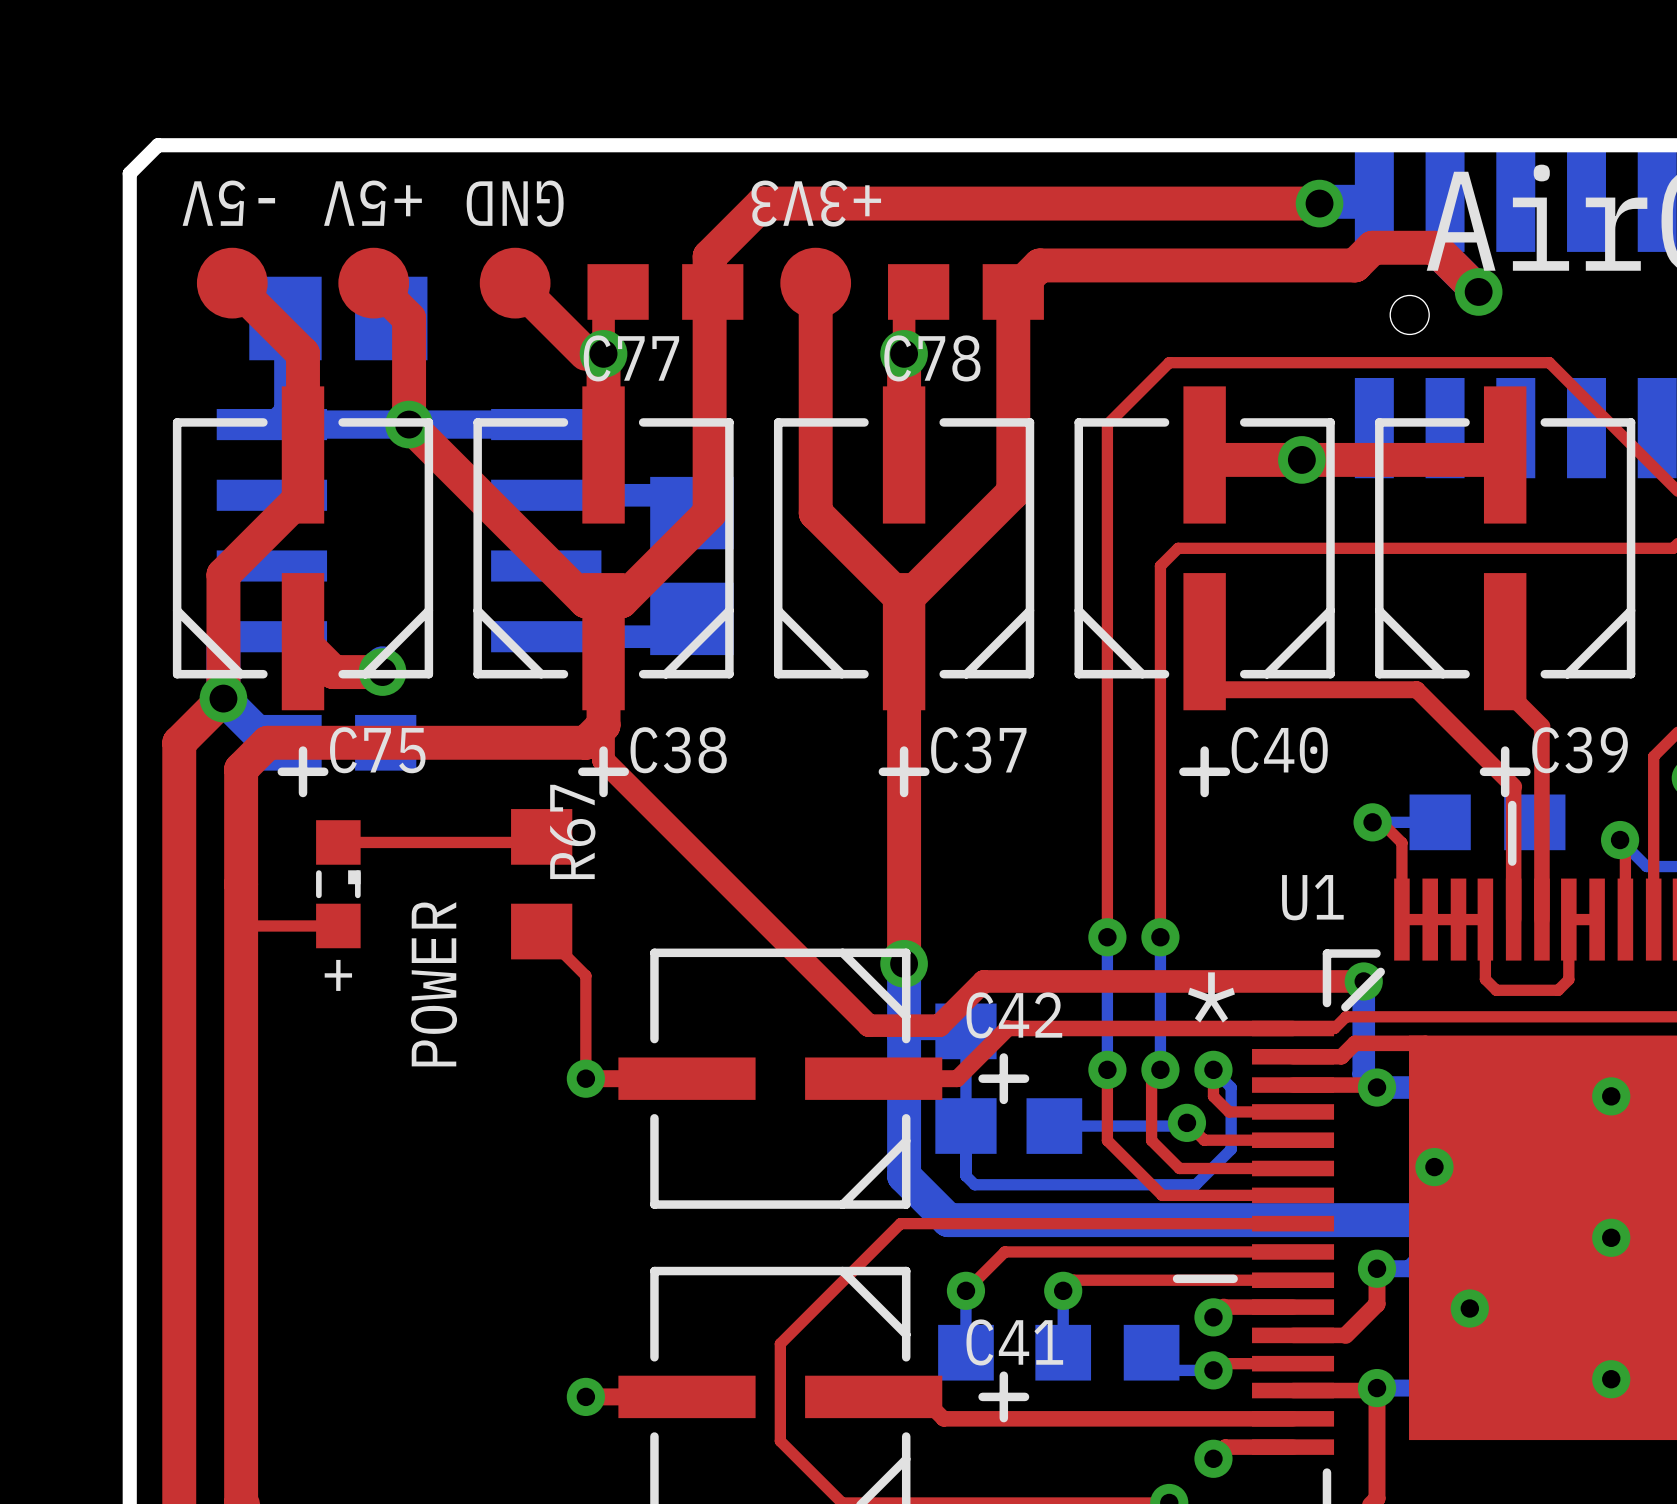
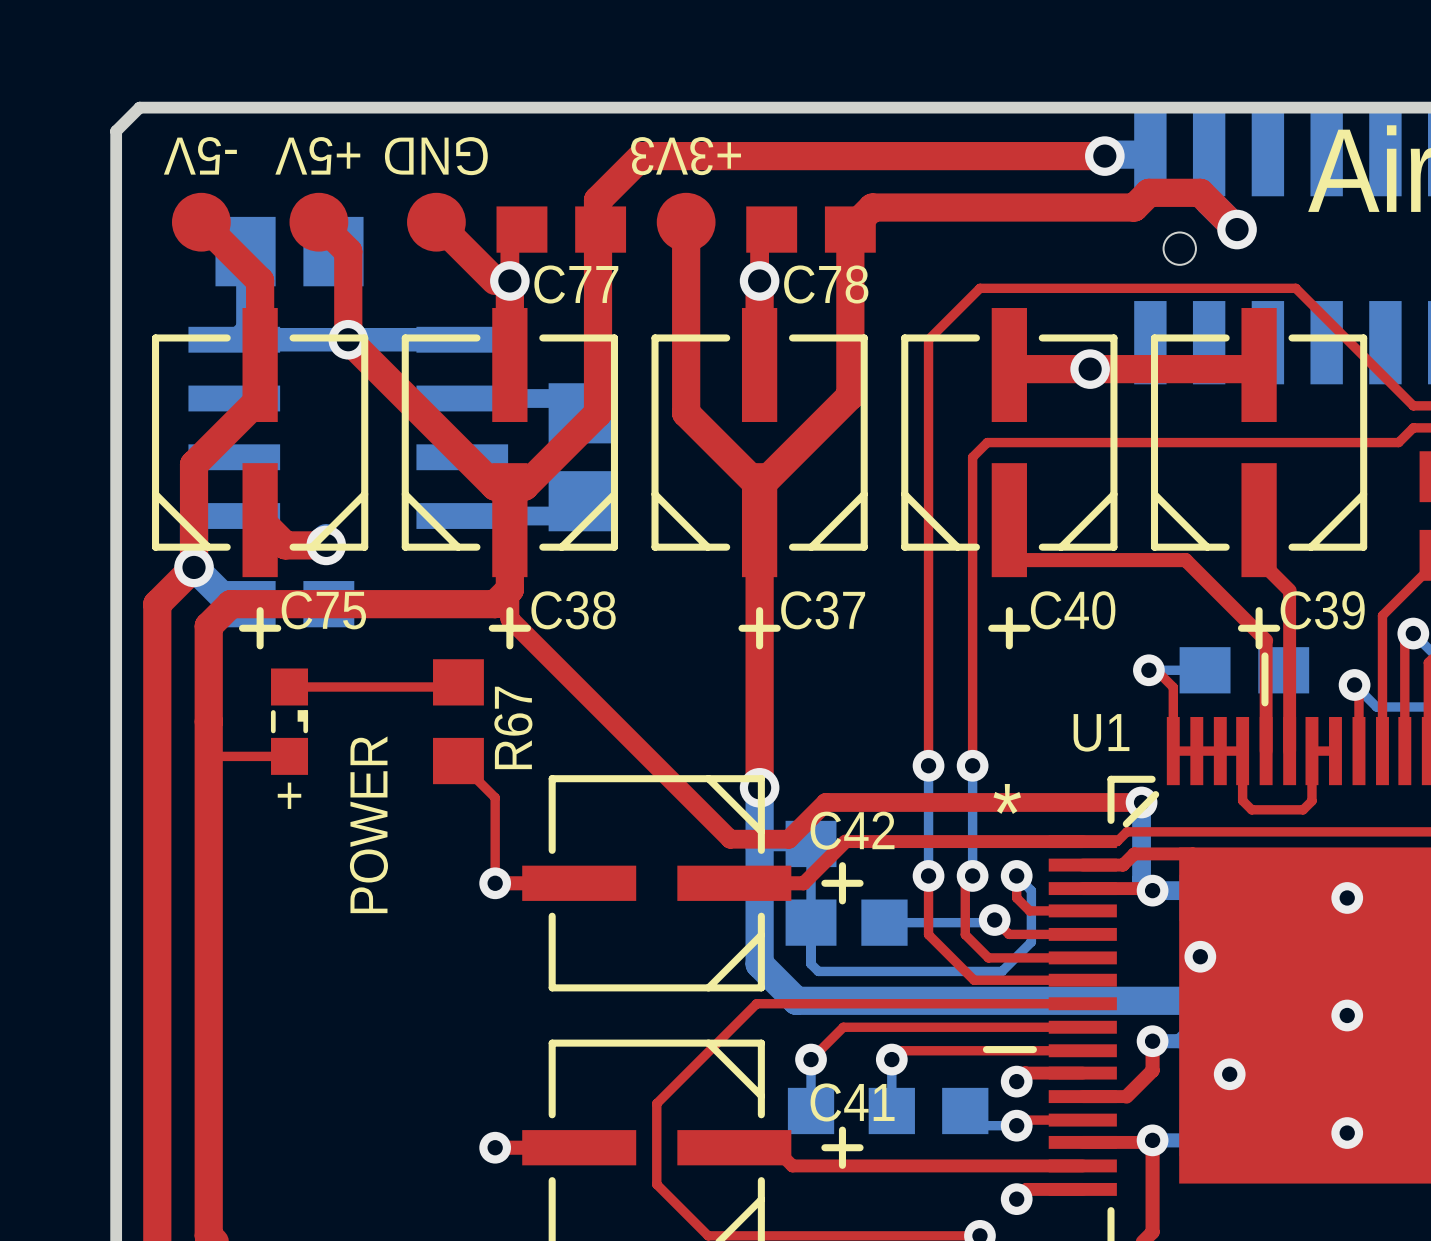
C77 name position: C77 (631, 358) -> C77 (576, 284)
C78 name position: C78 (932, 358) -> C78 (826, 284)
R67 name position: R67 (572, 831) -> R67 (513, 727)

